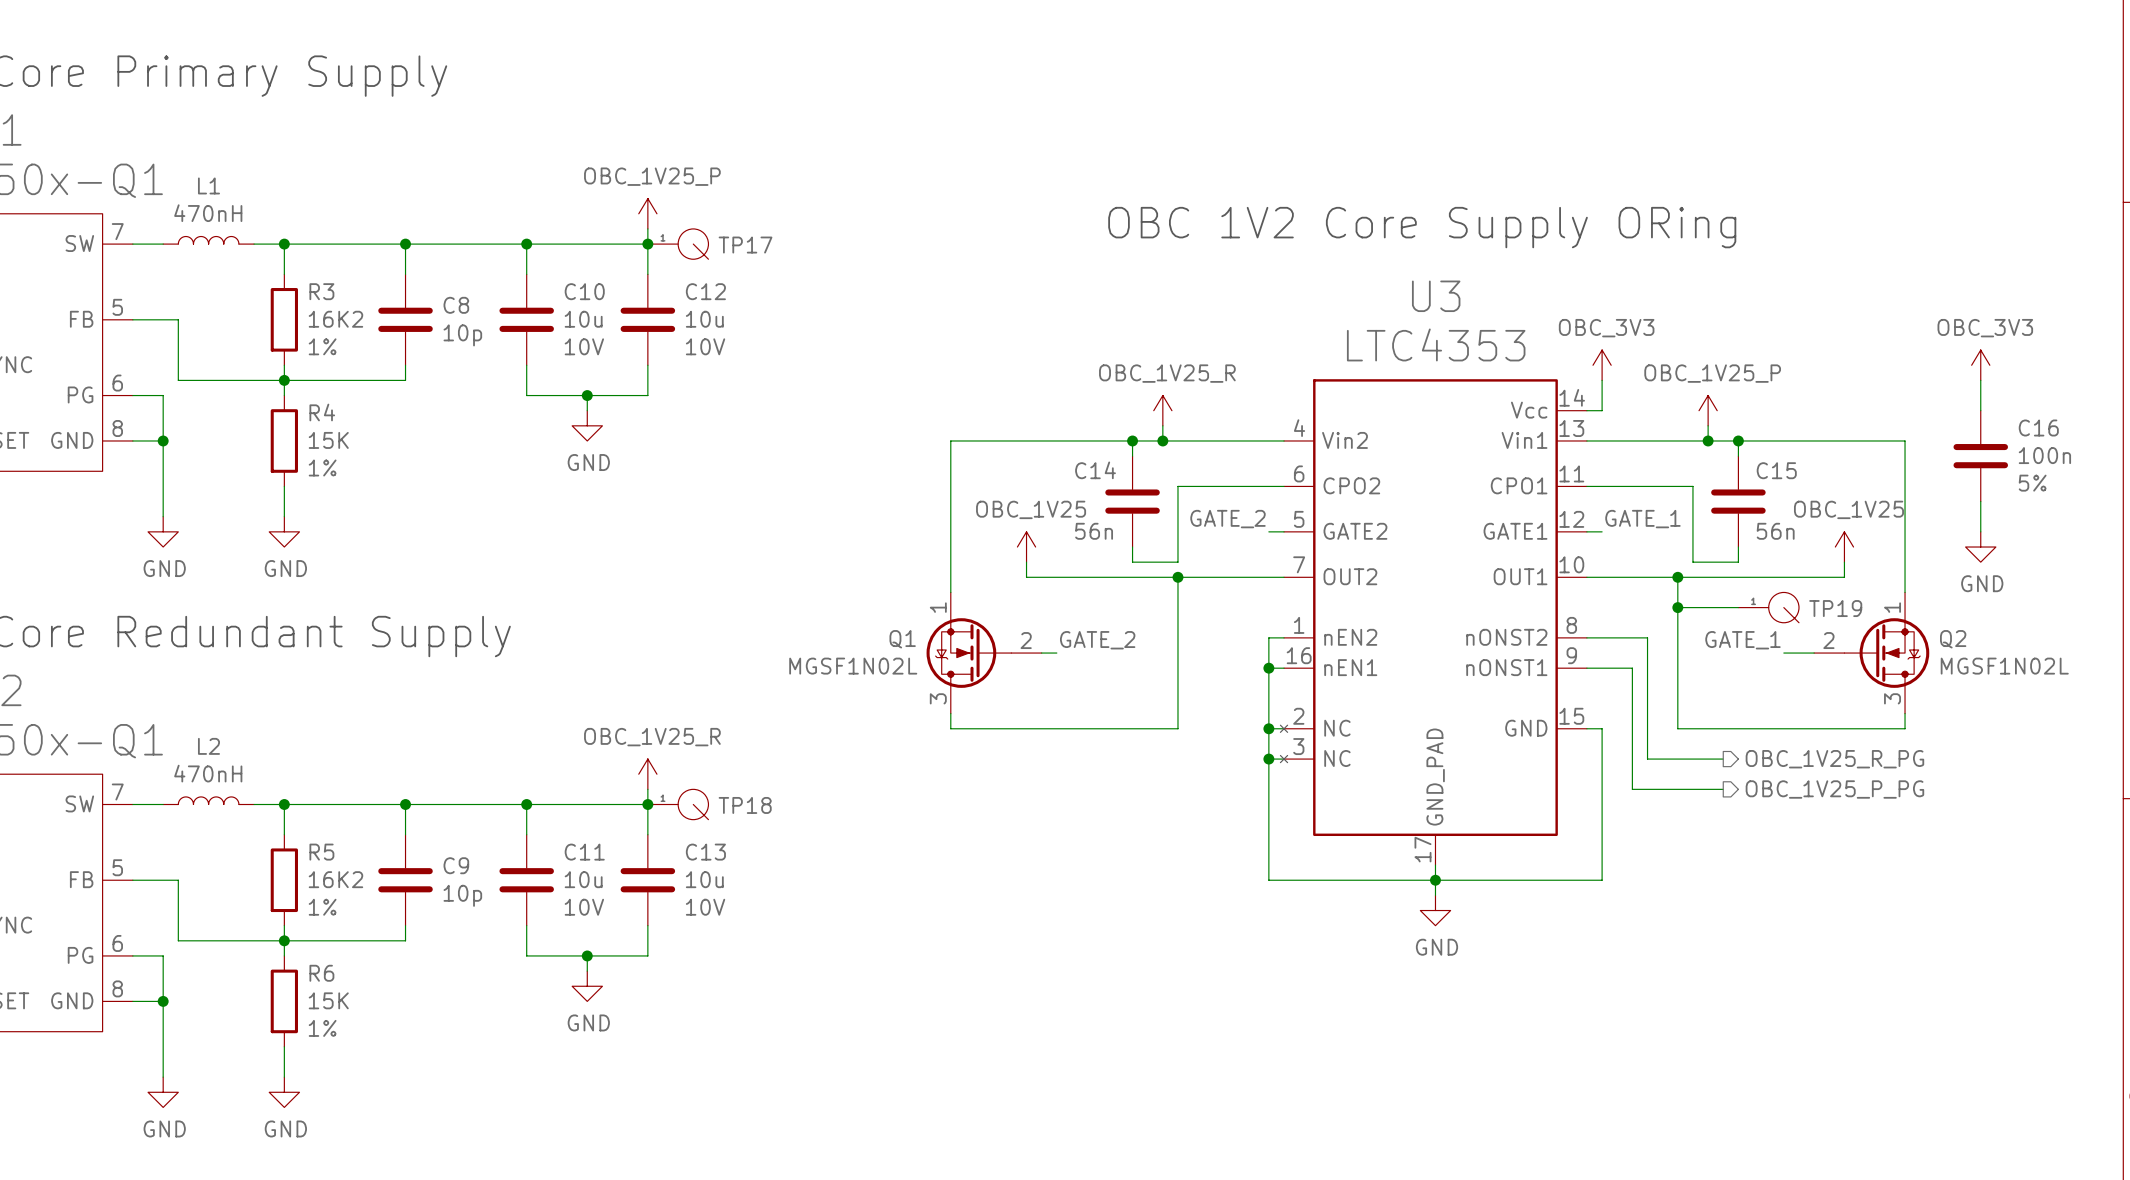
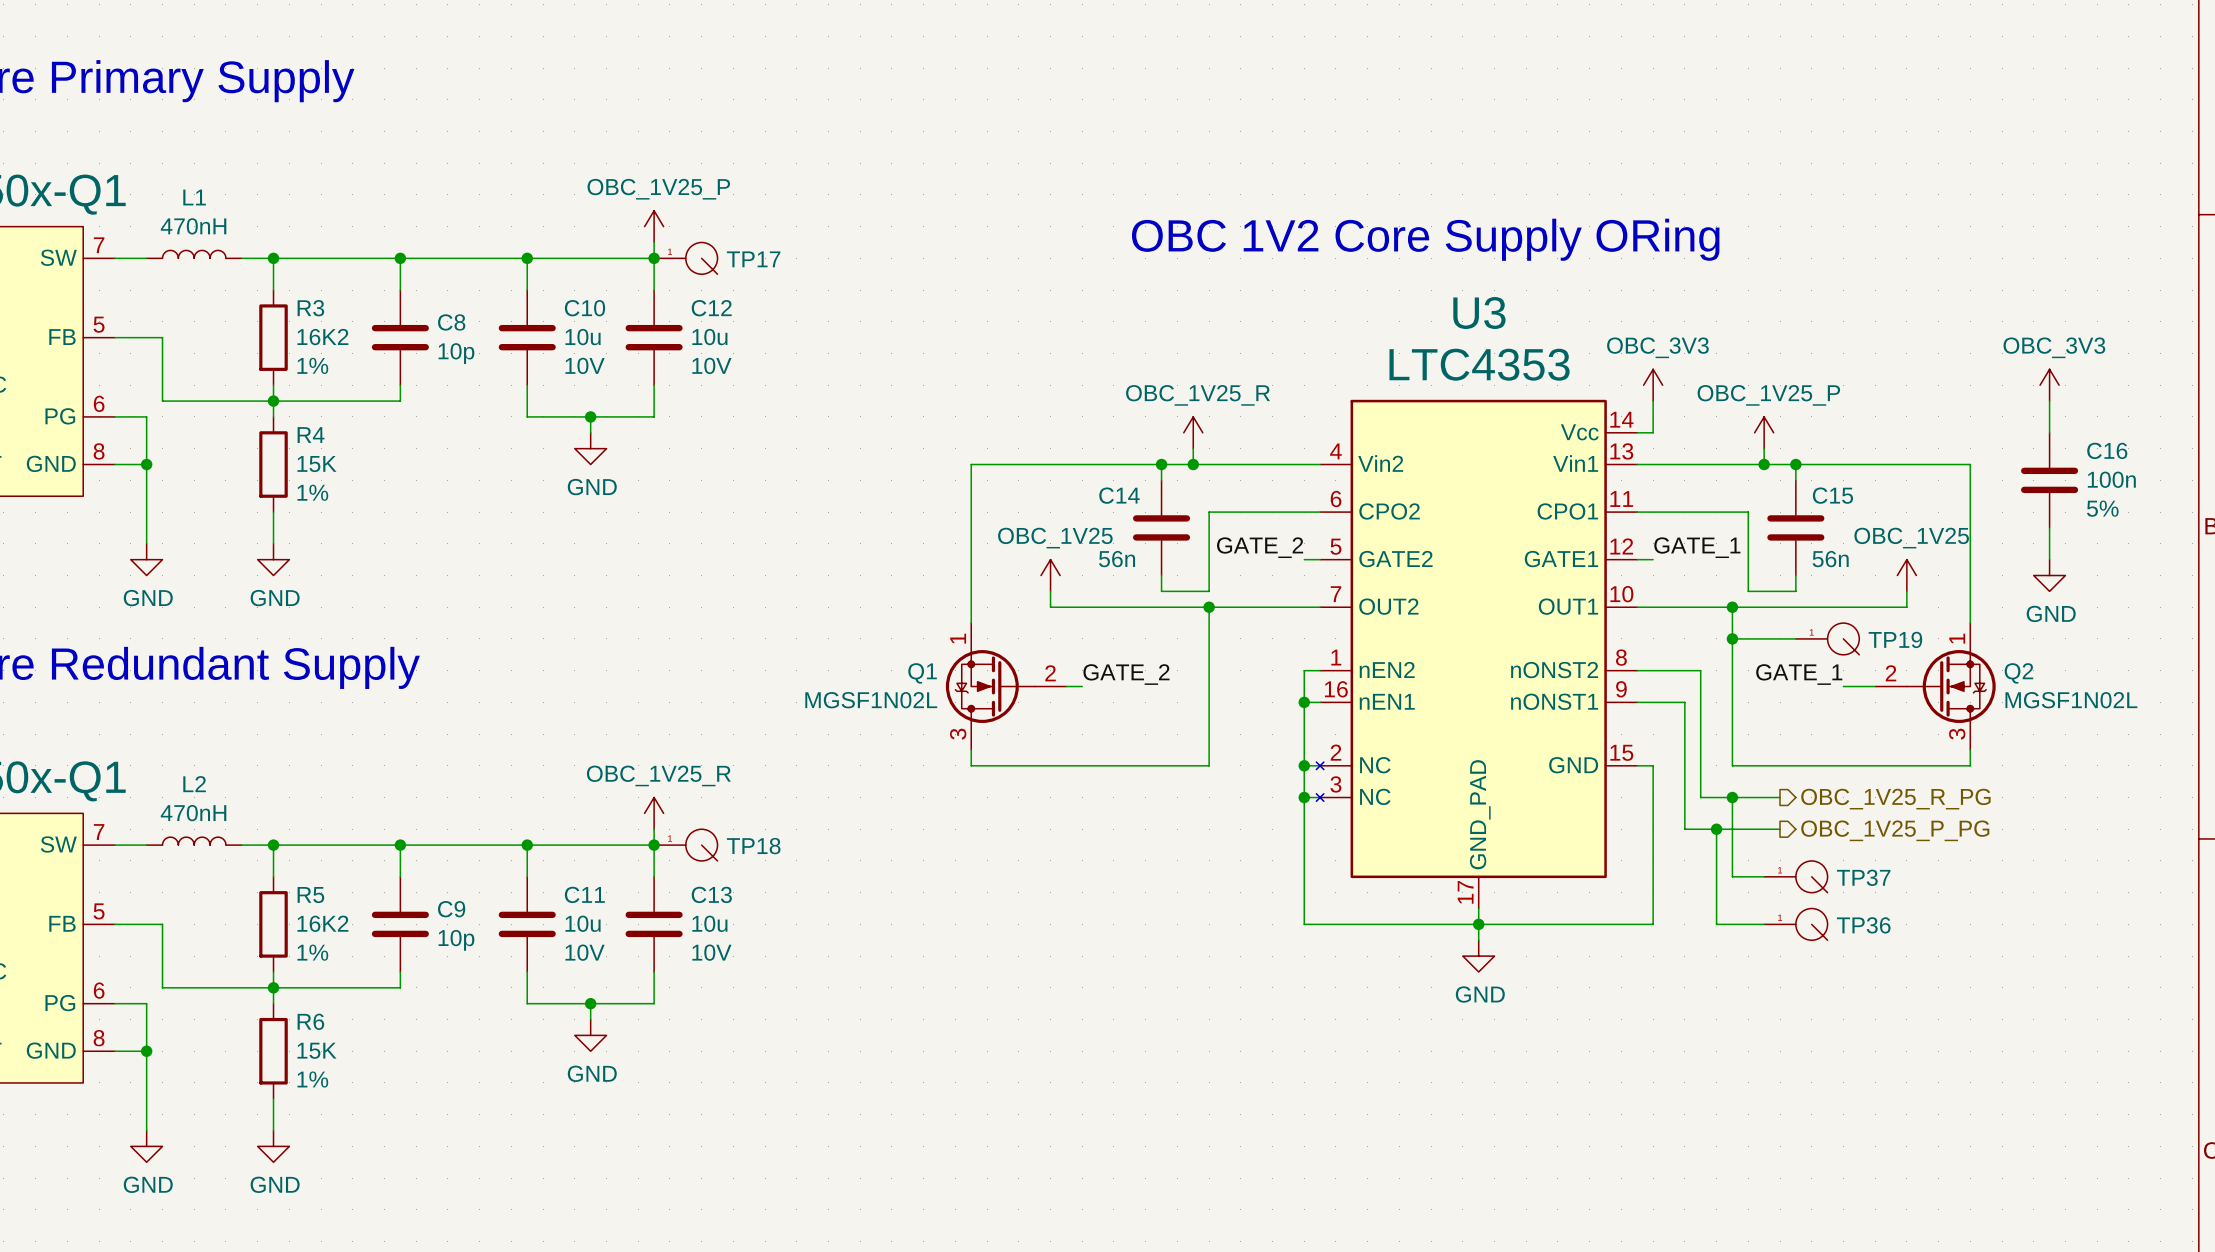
wire: none -> (1732, 797) (1732, 876) (1764, 876)
junction: none -> (1732, 797)
wire: none -> (1716, 829) (1716, 924) (1764, 924)
junction: none -> (1716, 829)
TP37: none -> (1795, 876)
TP36: none -> (1795, 924)

